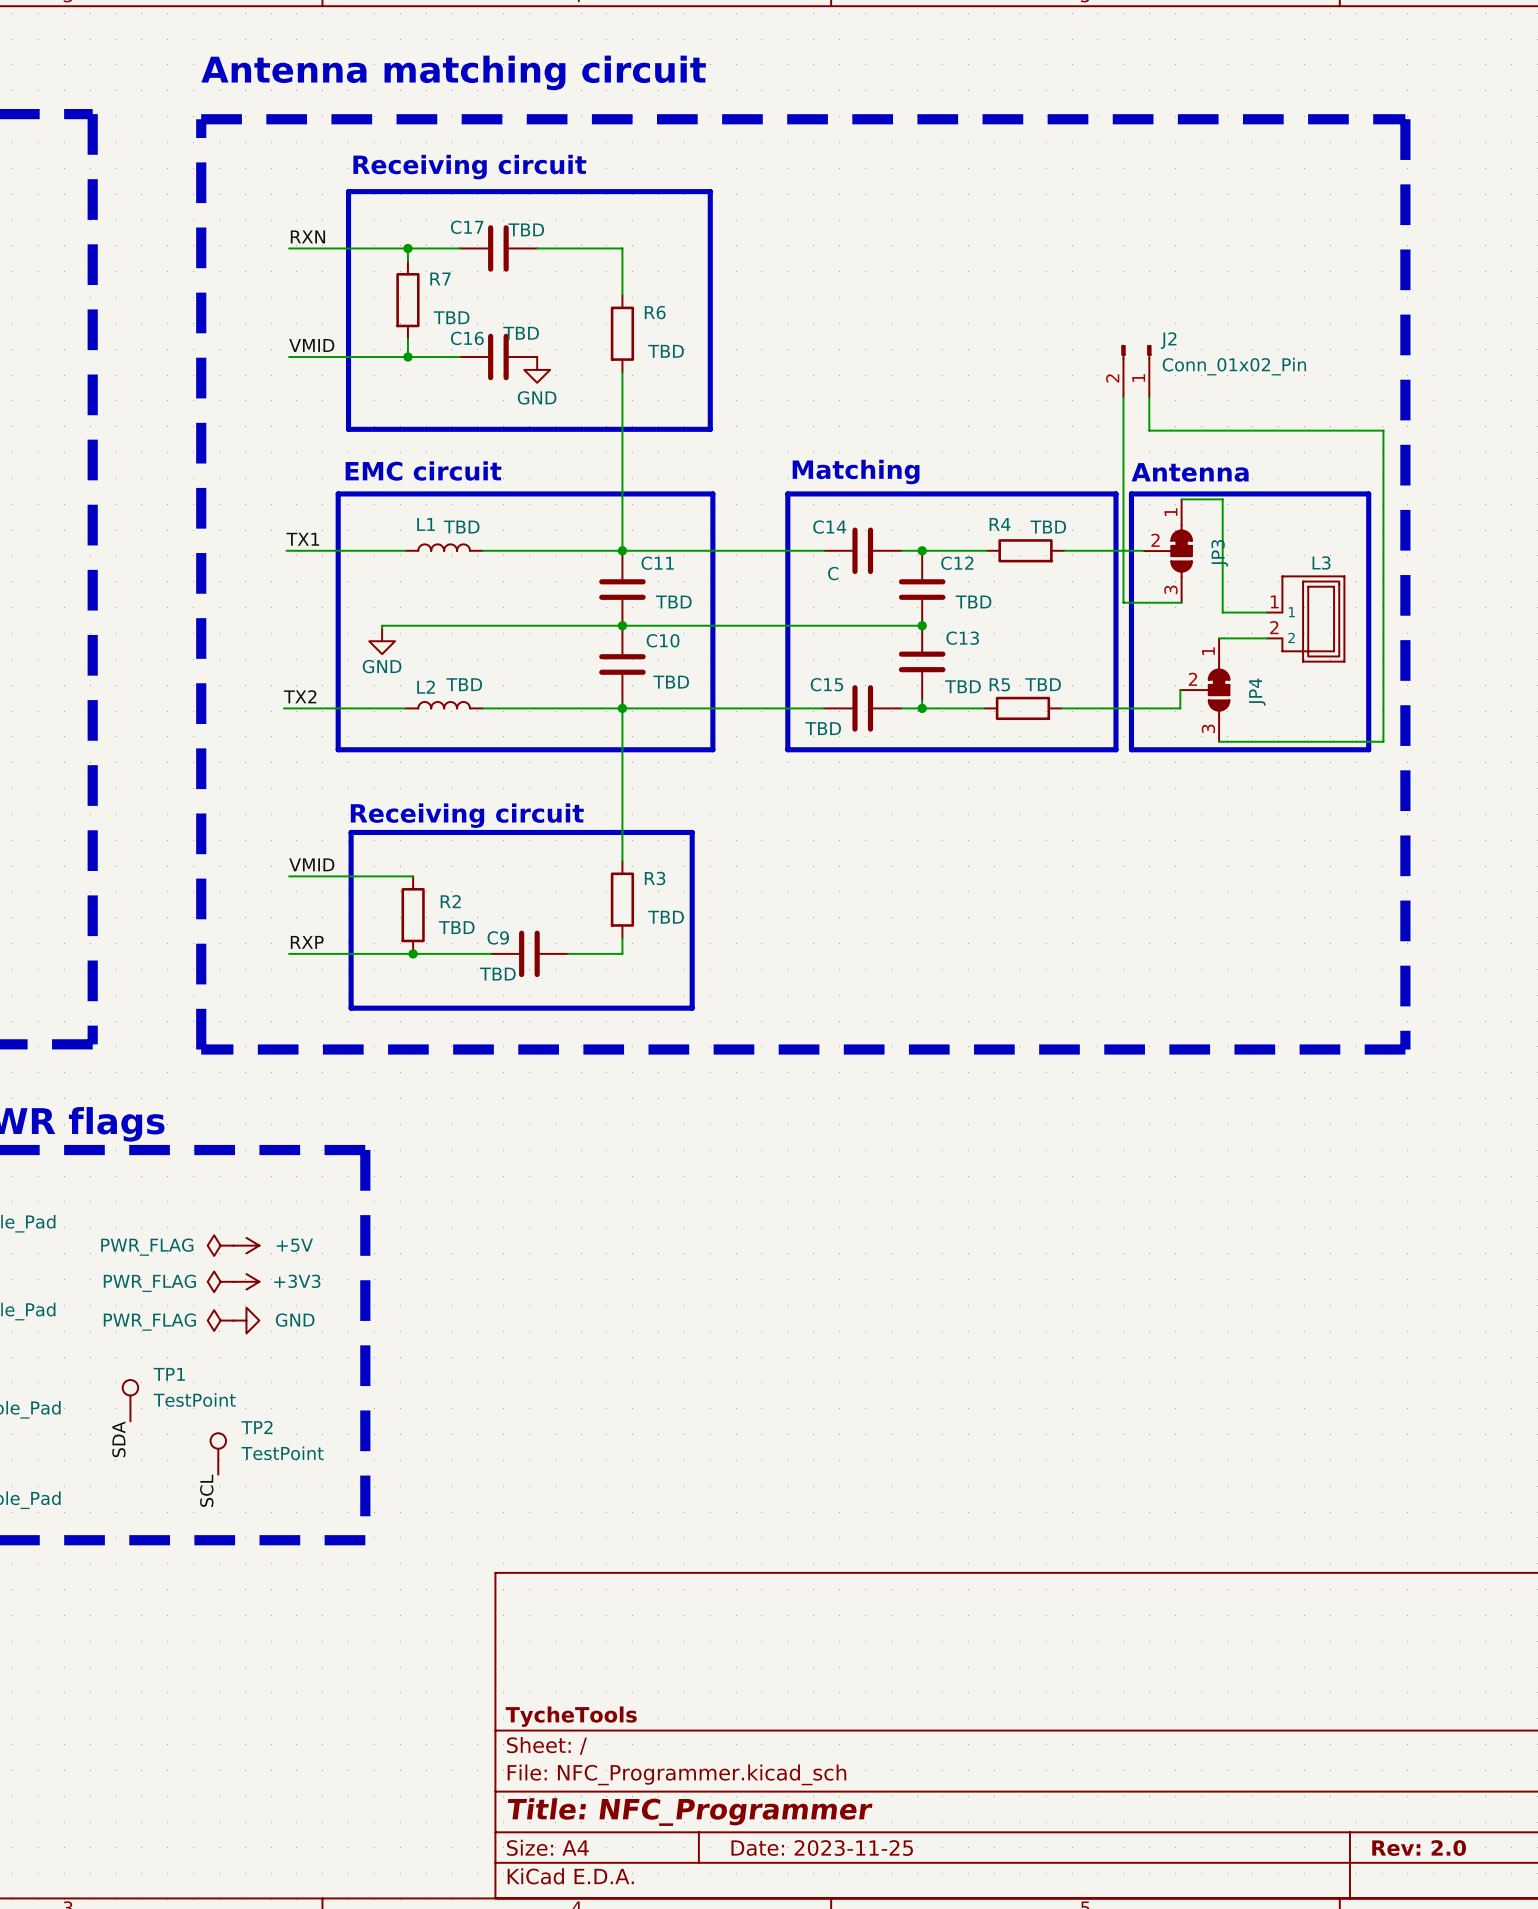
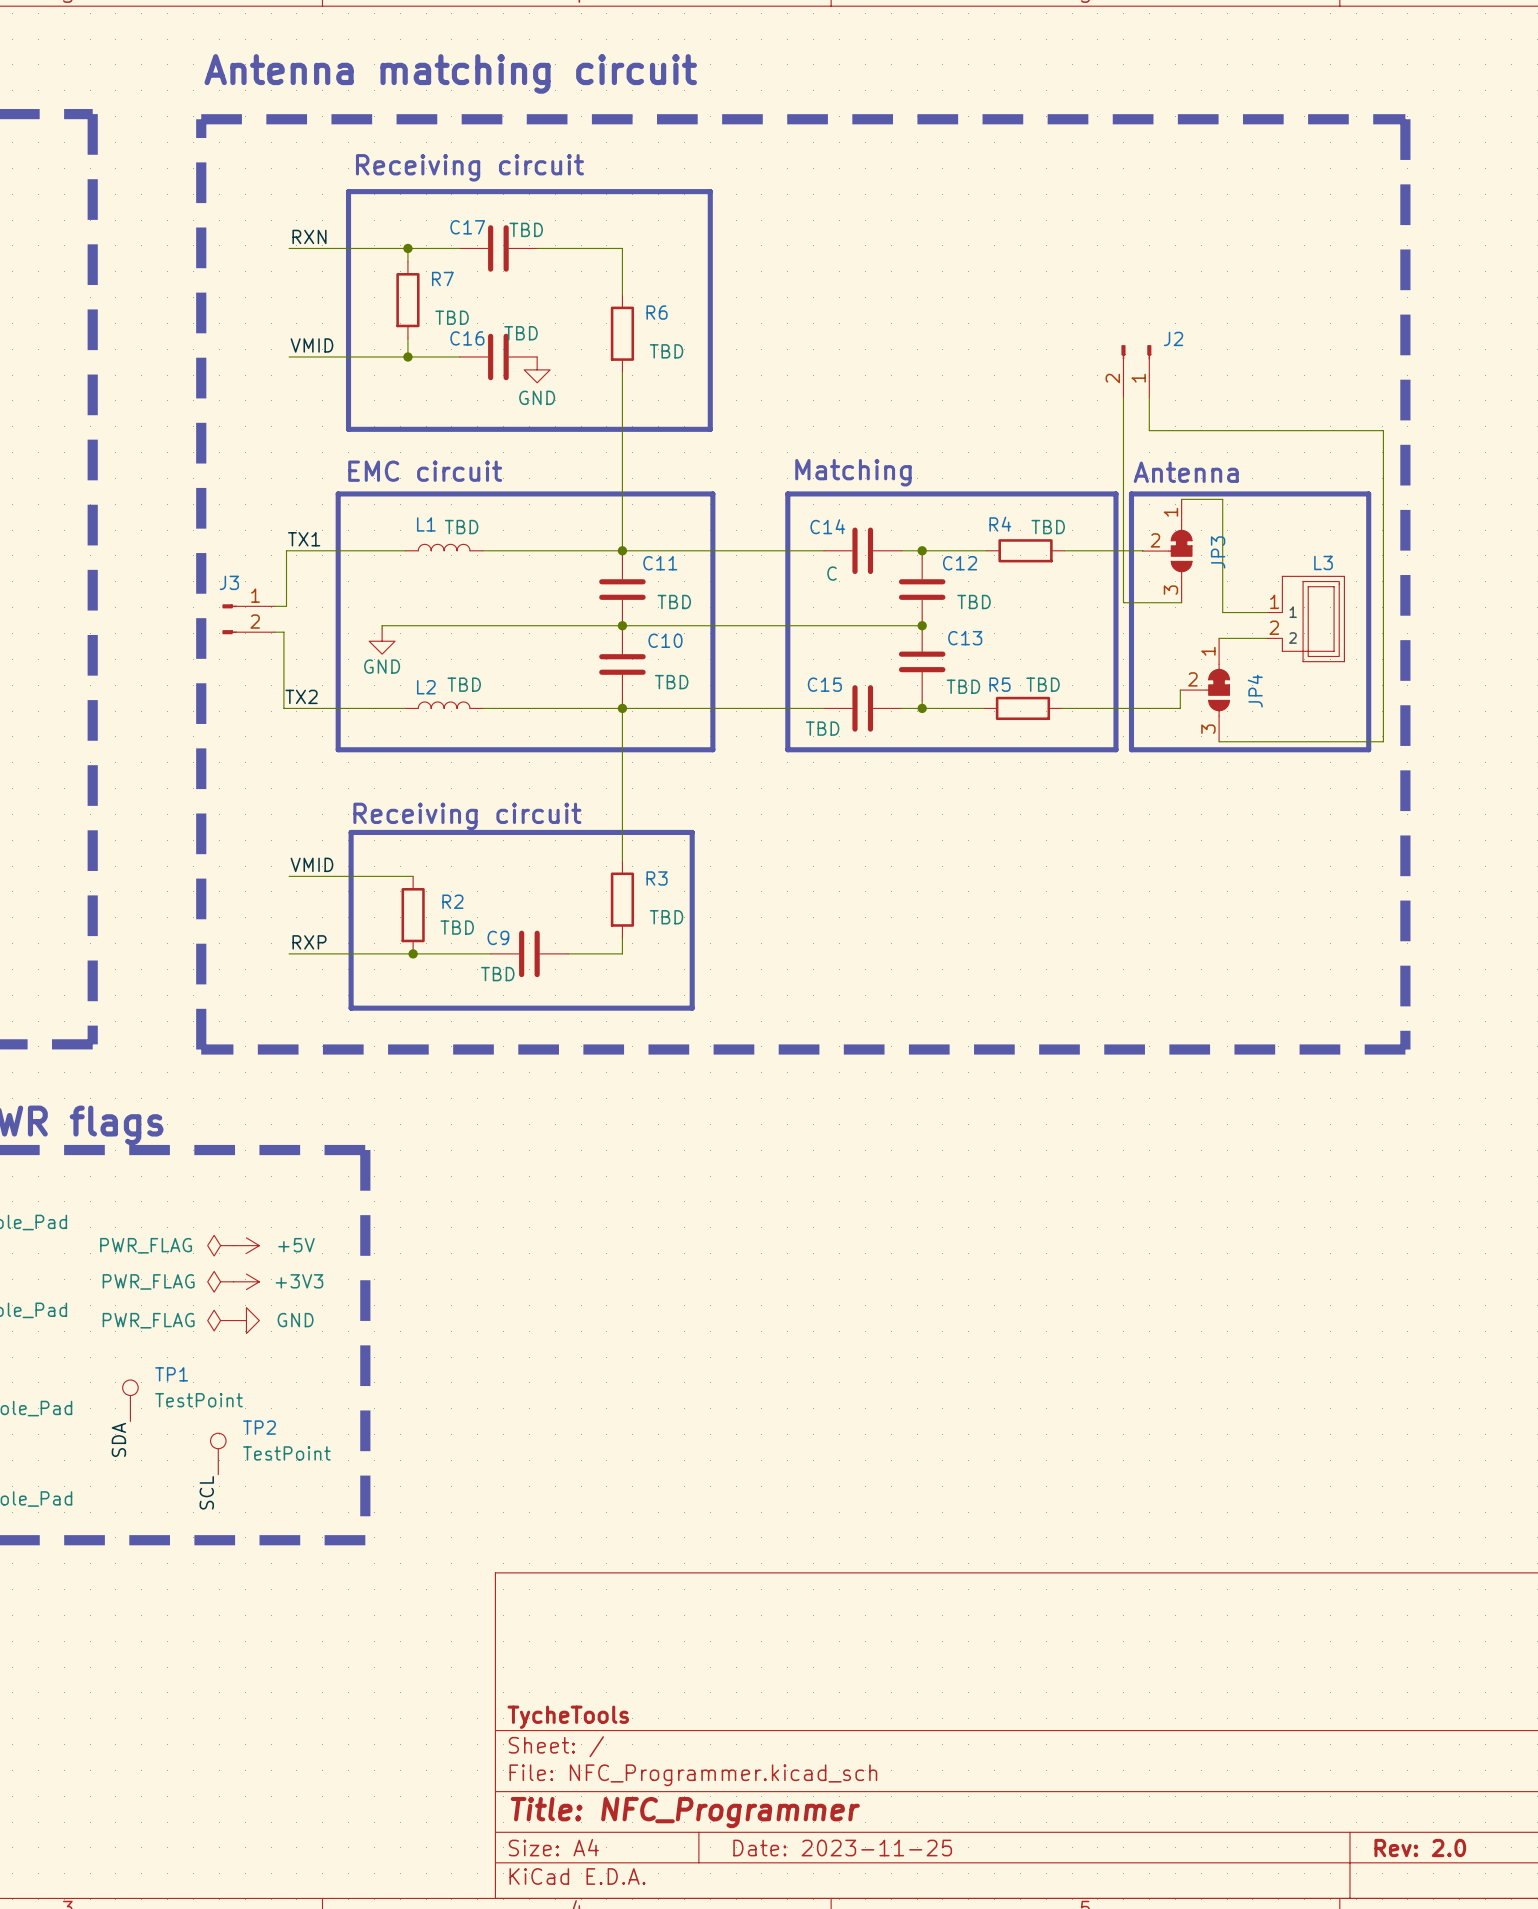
J2 value: Conn_01x02_Pin (1234, 366) -> none
wire: none -> (286, 550) (286, 606) (274, 606)
J3: none -> (248, 619)
wire: none -> (274, 632) (283, 632) (283, 708)

